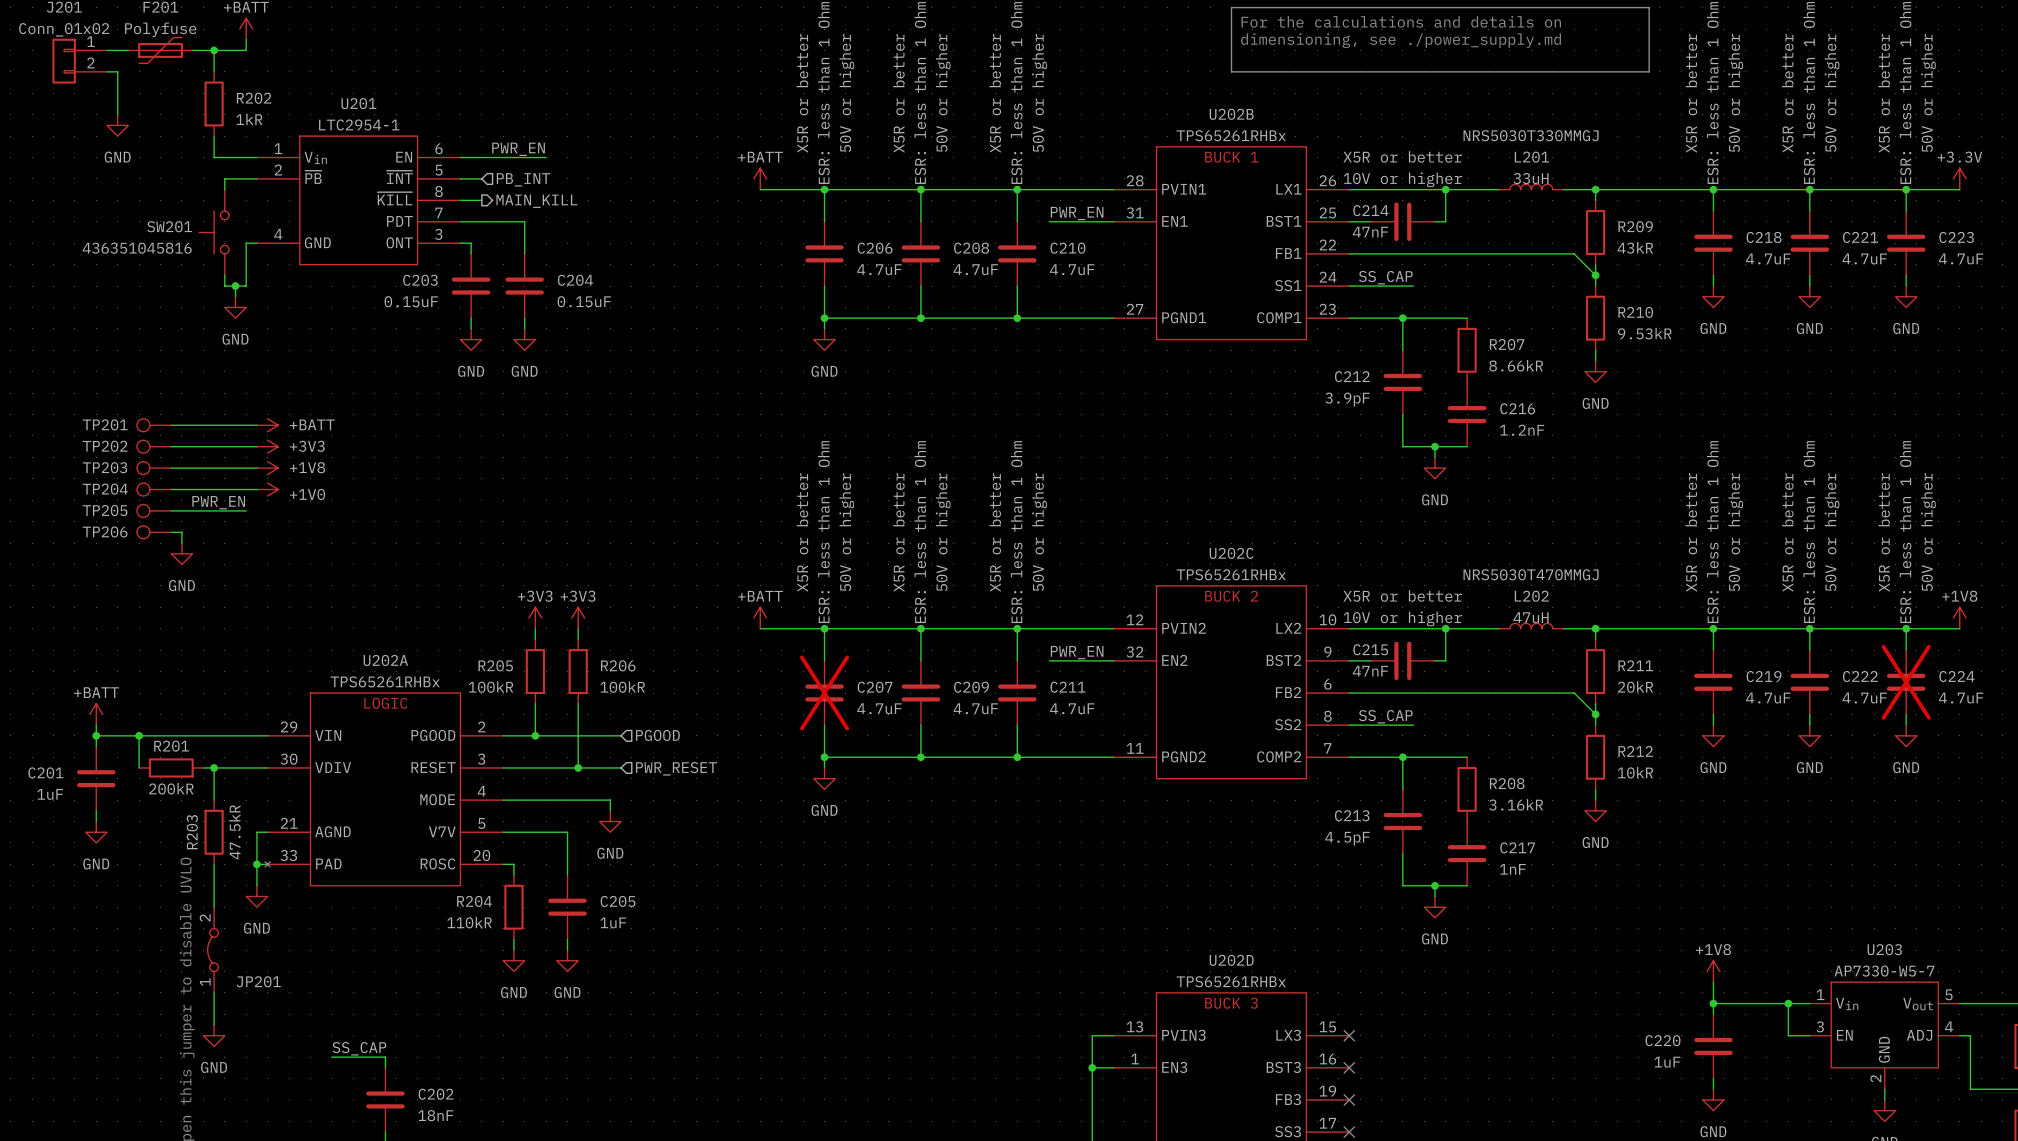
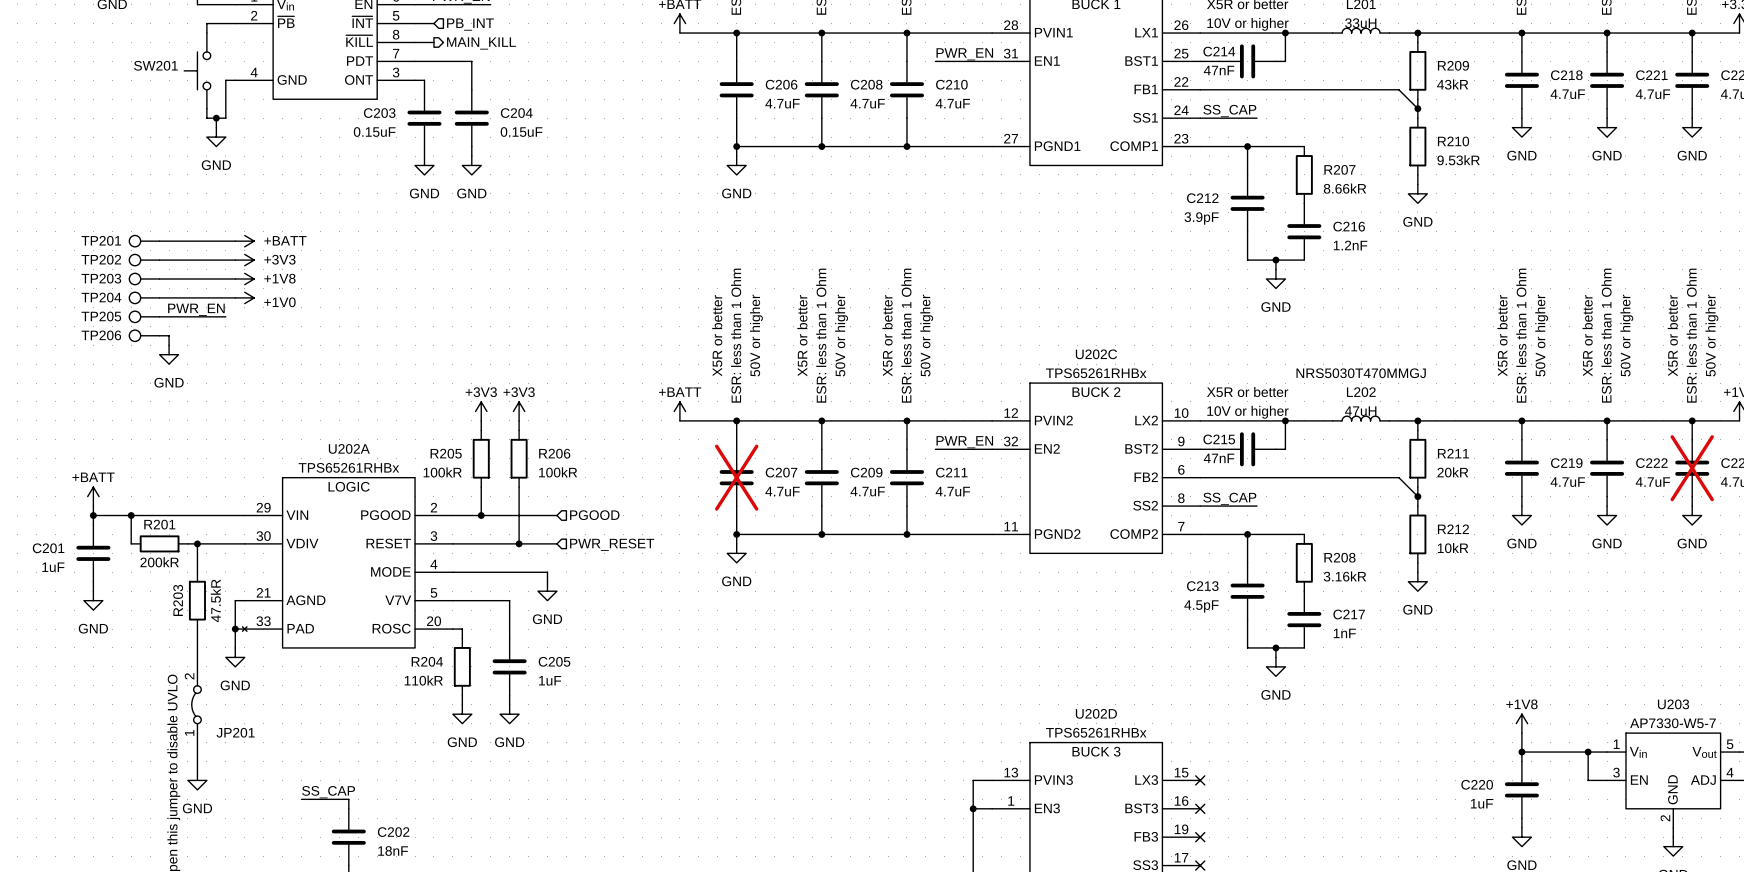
SW201 value: 436351045816 (137, 248) -> none

